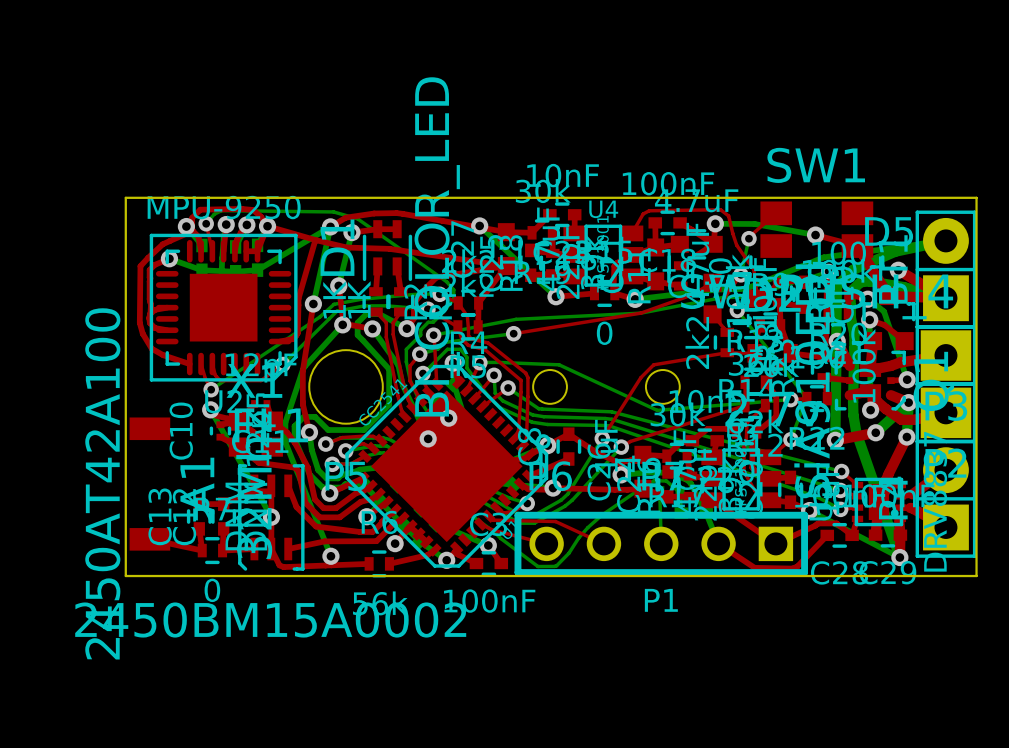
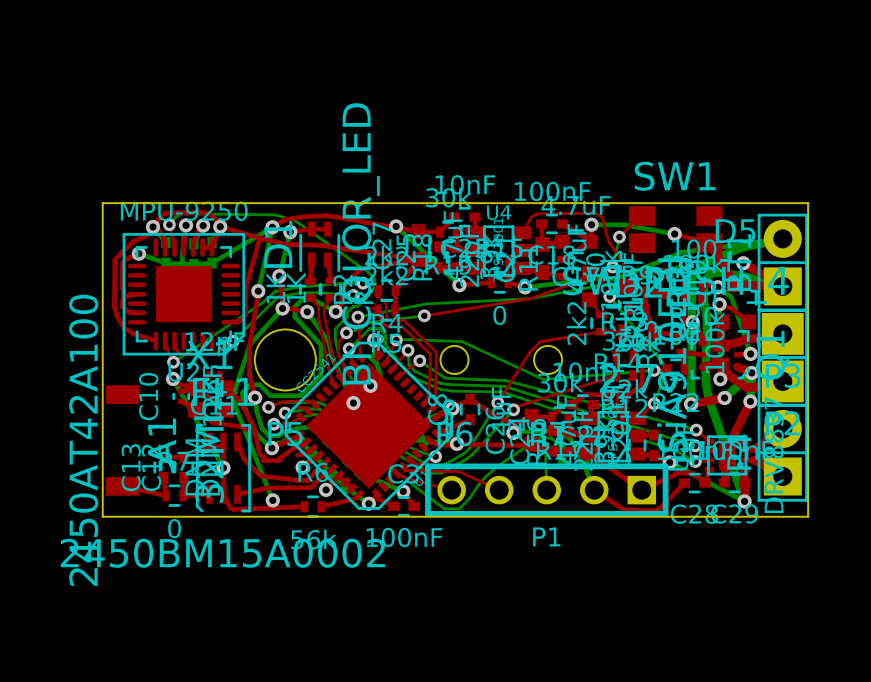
top track: (439, 294) (458, 302) (467, 316) (468, 335) (471, 338) (488, 342) (525, 373) (527, 377) (526, 438) (522, 446) -> (378, 290) (375, 295) (386, 302) (388, 320) (404, 320) (436, 352) (435, 402) (431, 409)
top track: (427, 309) (457, 326) (461, 338) (468, 345) (485, 349) (521, 380) -> (370, 308) (378, 310) (379, 316) (386, 326) (401, 326) (430, 354)
top track: (298, 471) (305, 503) (319, 517) (339, 517) (360, 501) -> none

